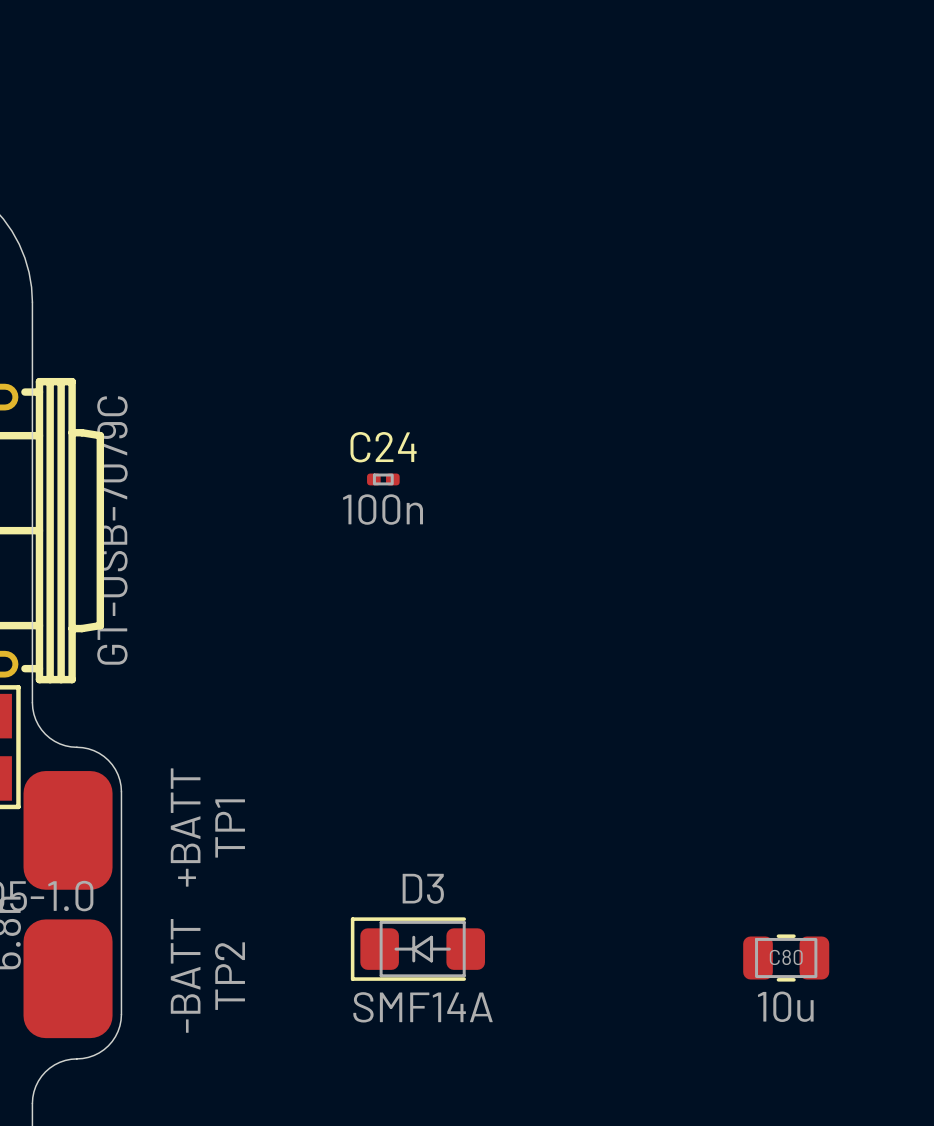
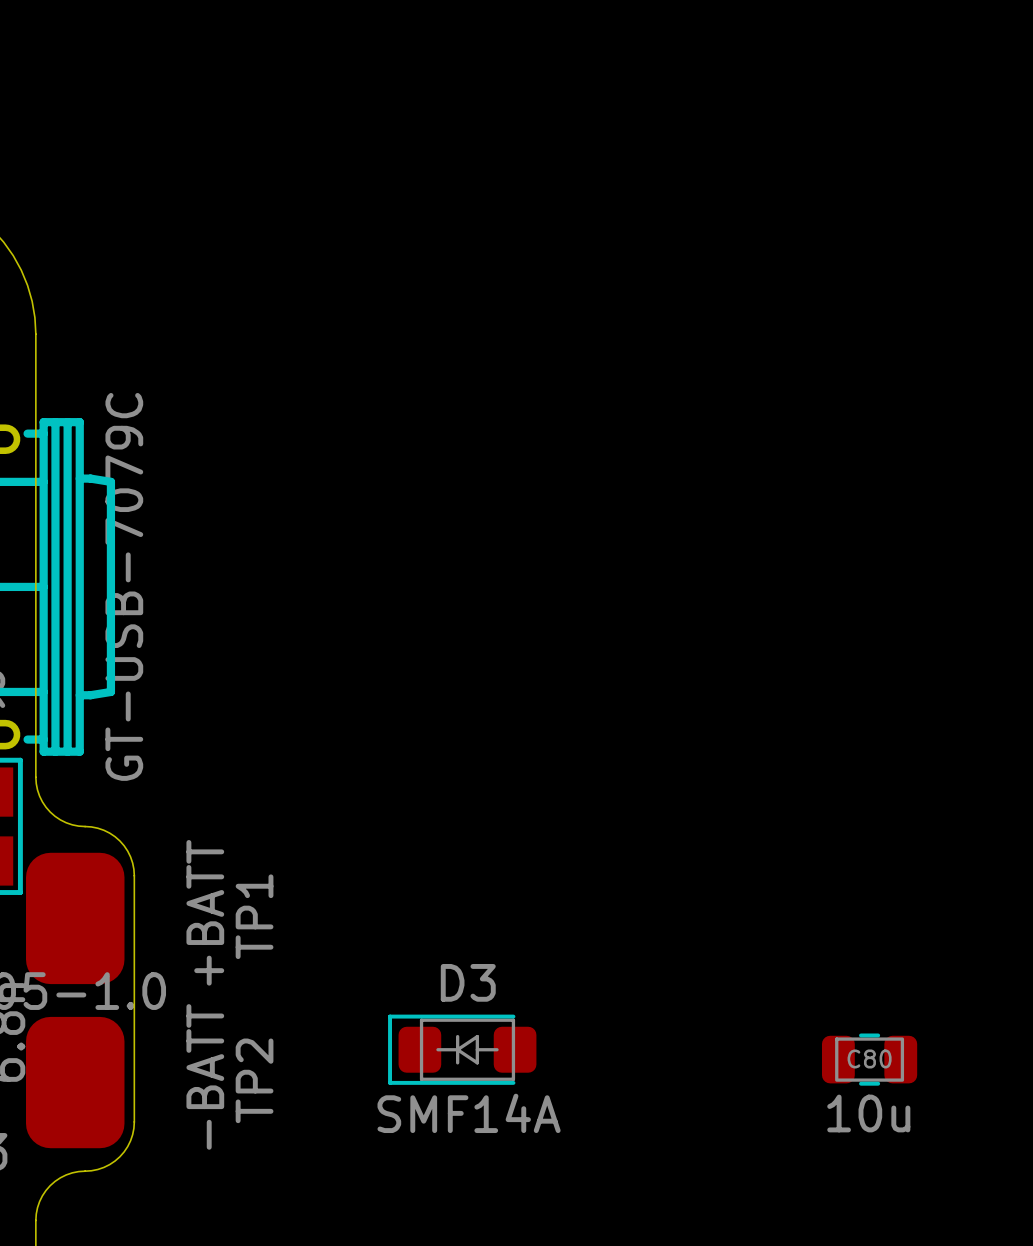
C24: 100n (383, 479) -> none

